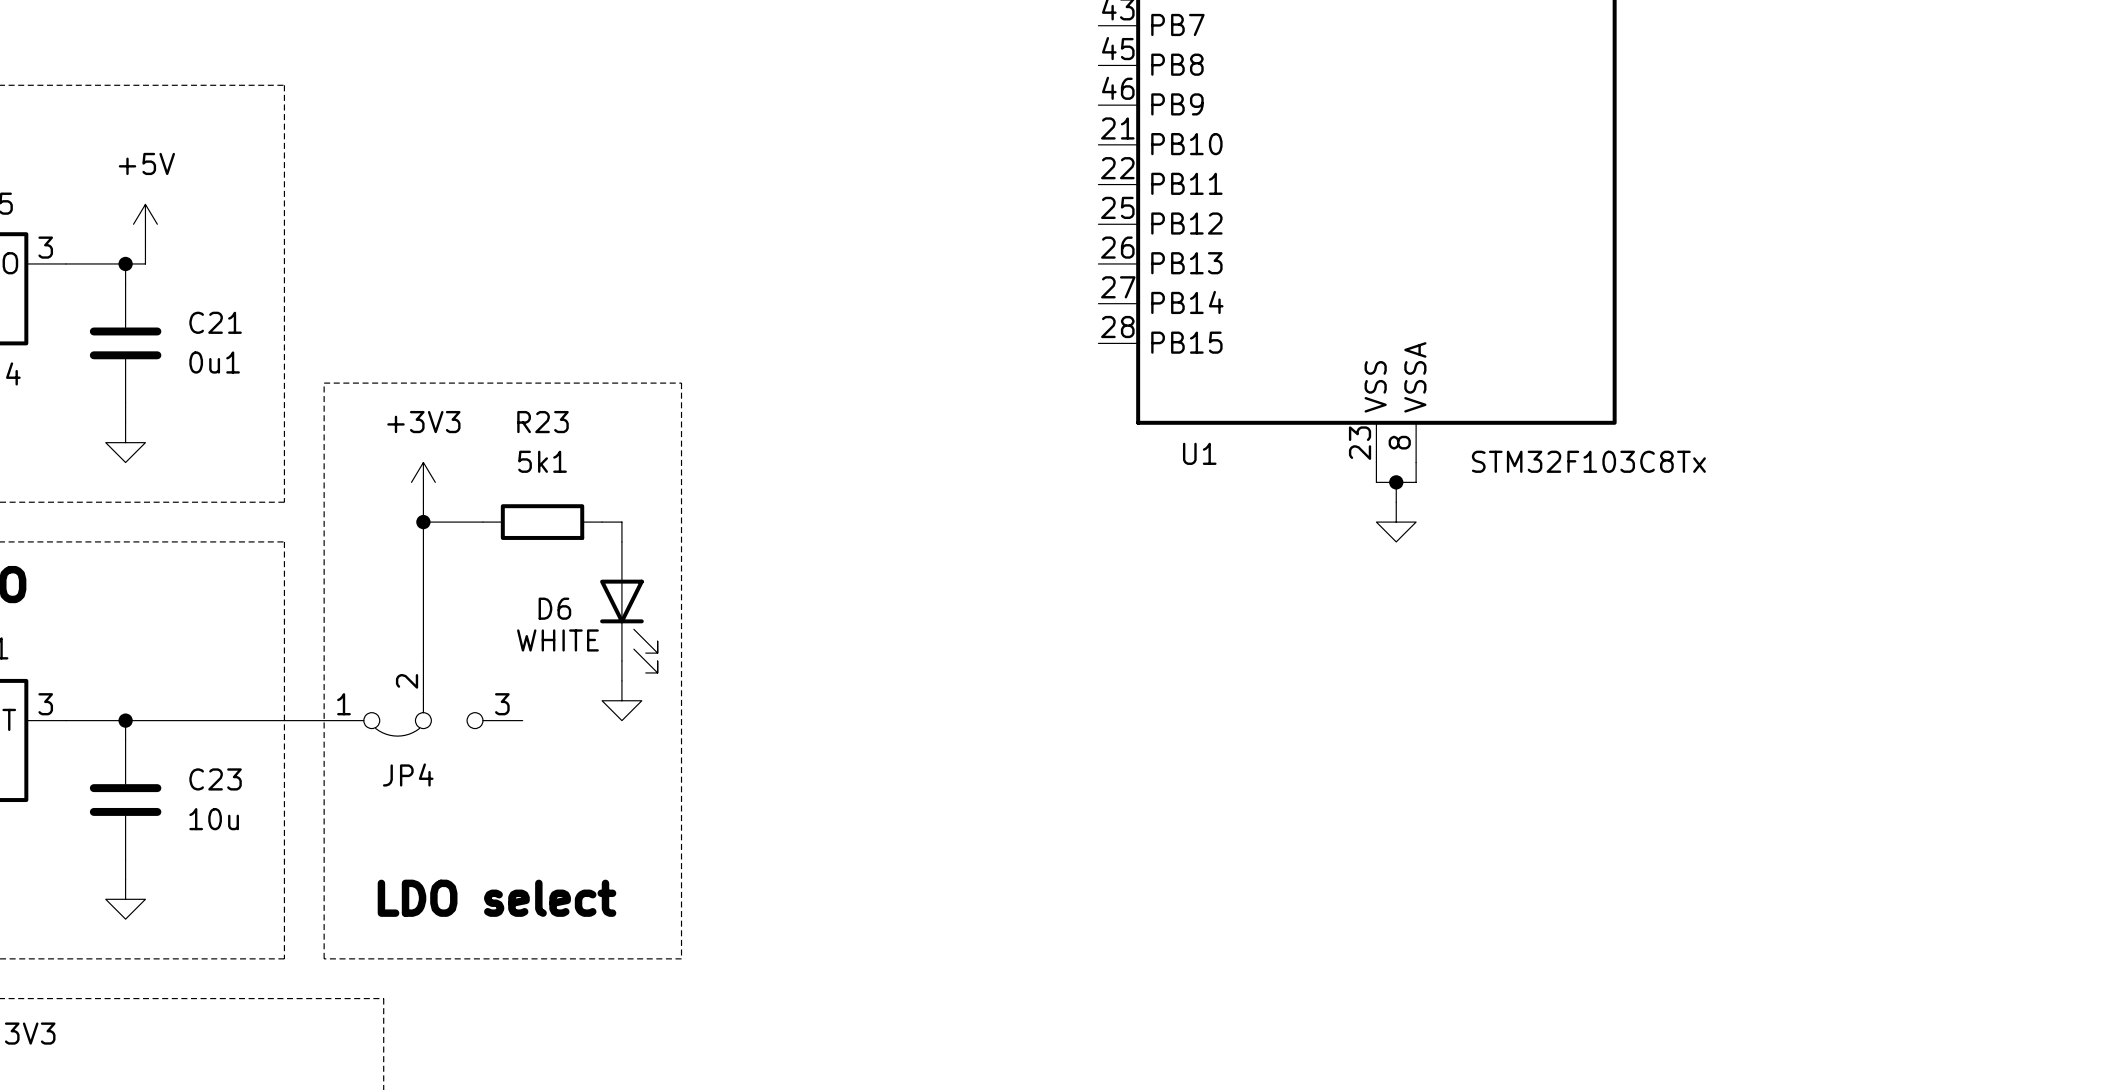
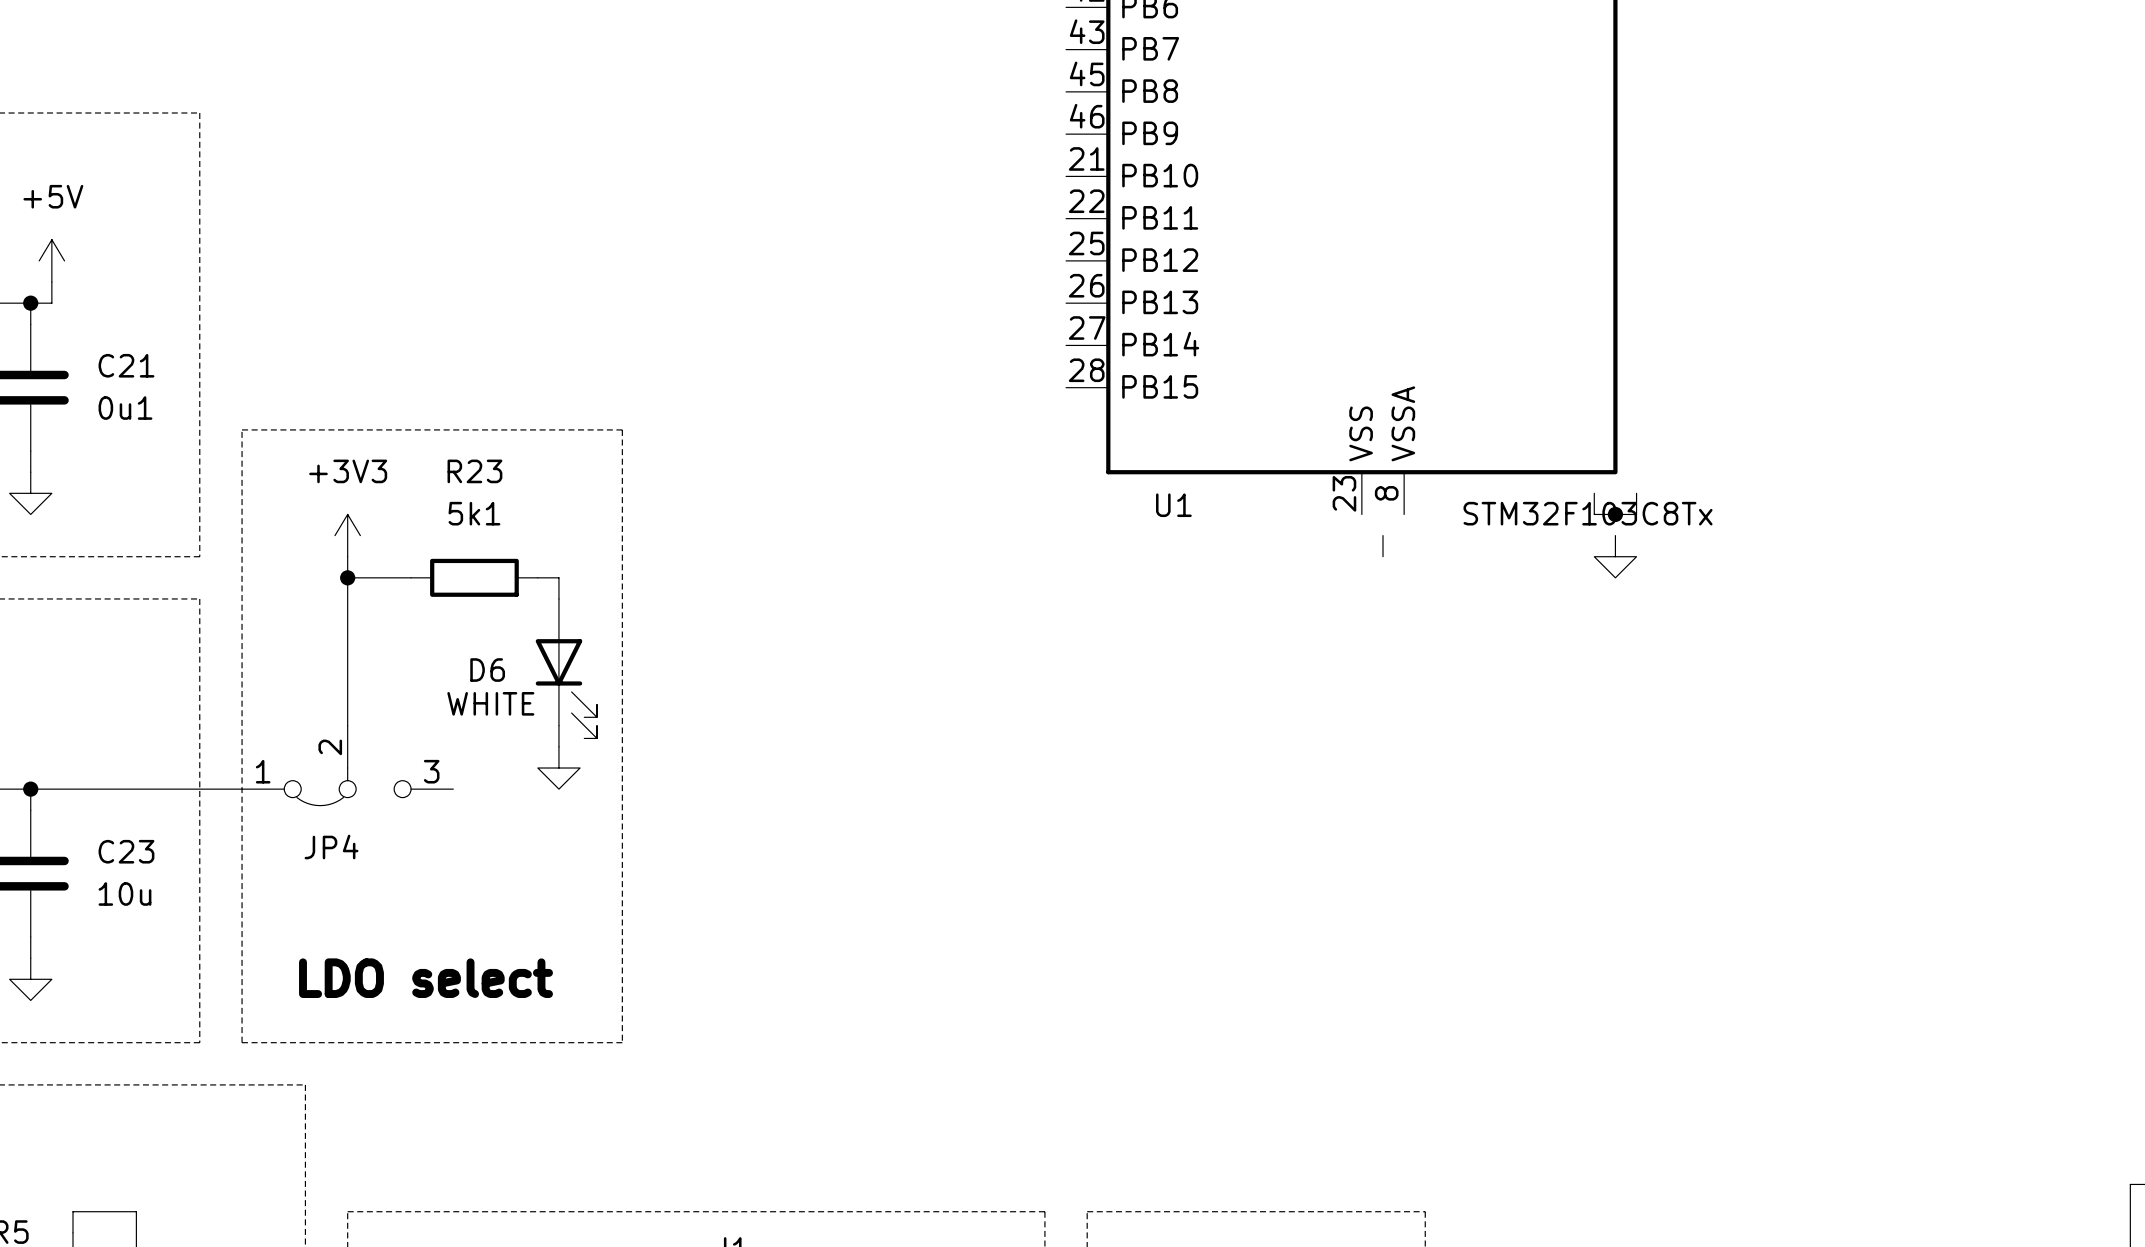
wire: (1376, 462) (1376, 482) (1416, 482) (1416, 462) -> (1594, 493) (1594, 514) (1636, 514) (1636, 493)
junction: none -> (1615, 514)
junction: (1396, 482) -> none
power symbol position: (1396, 522) -> (1615, 556)

